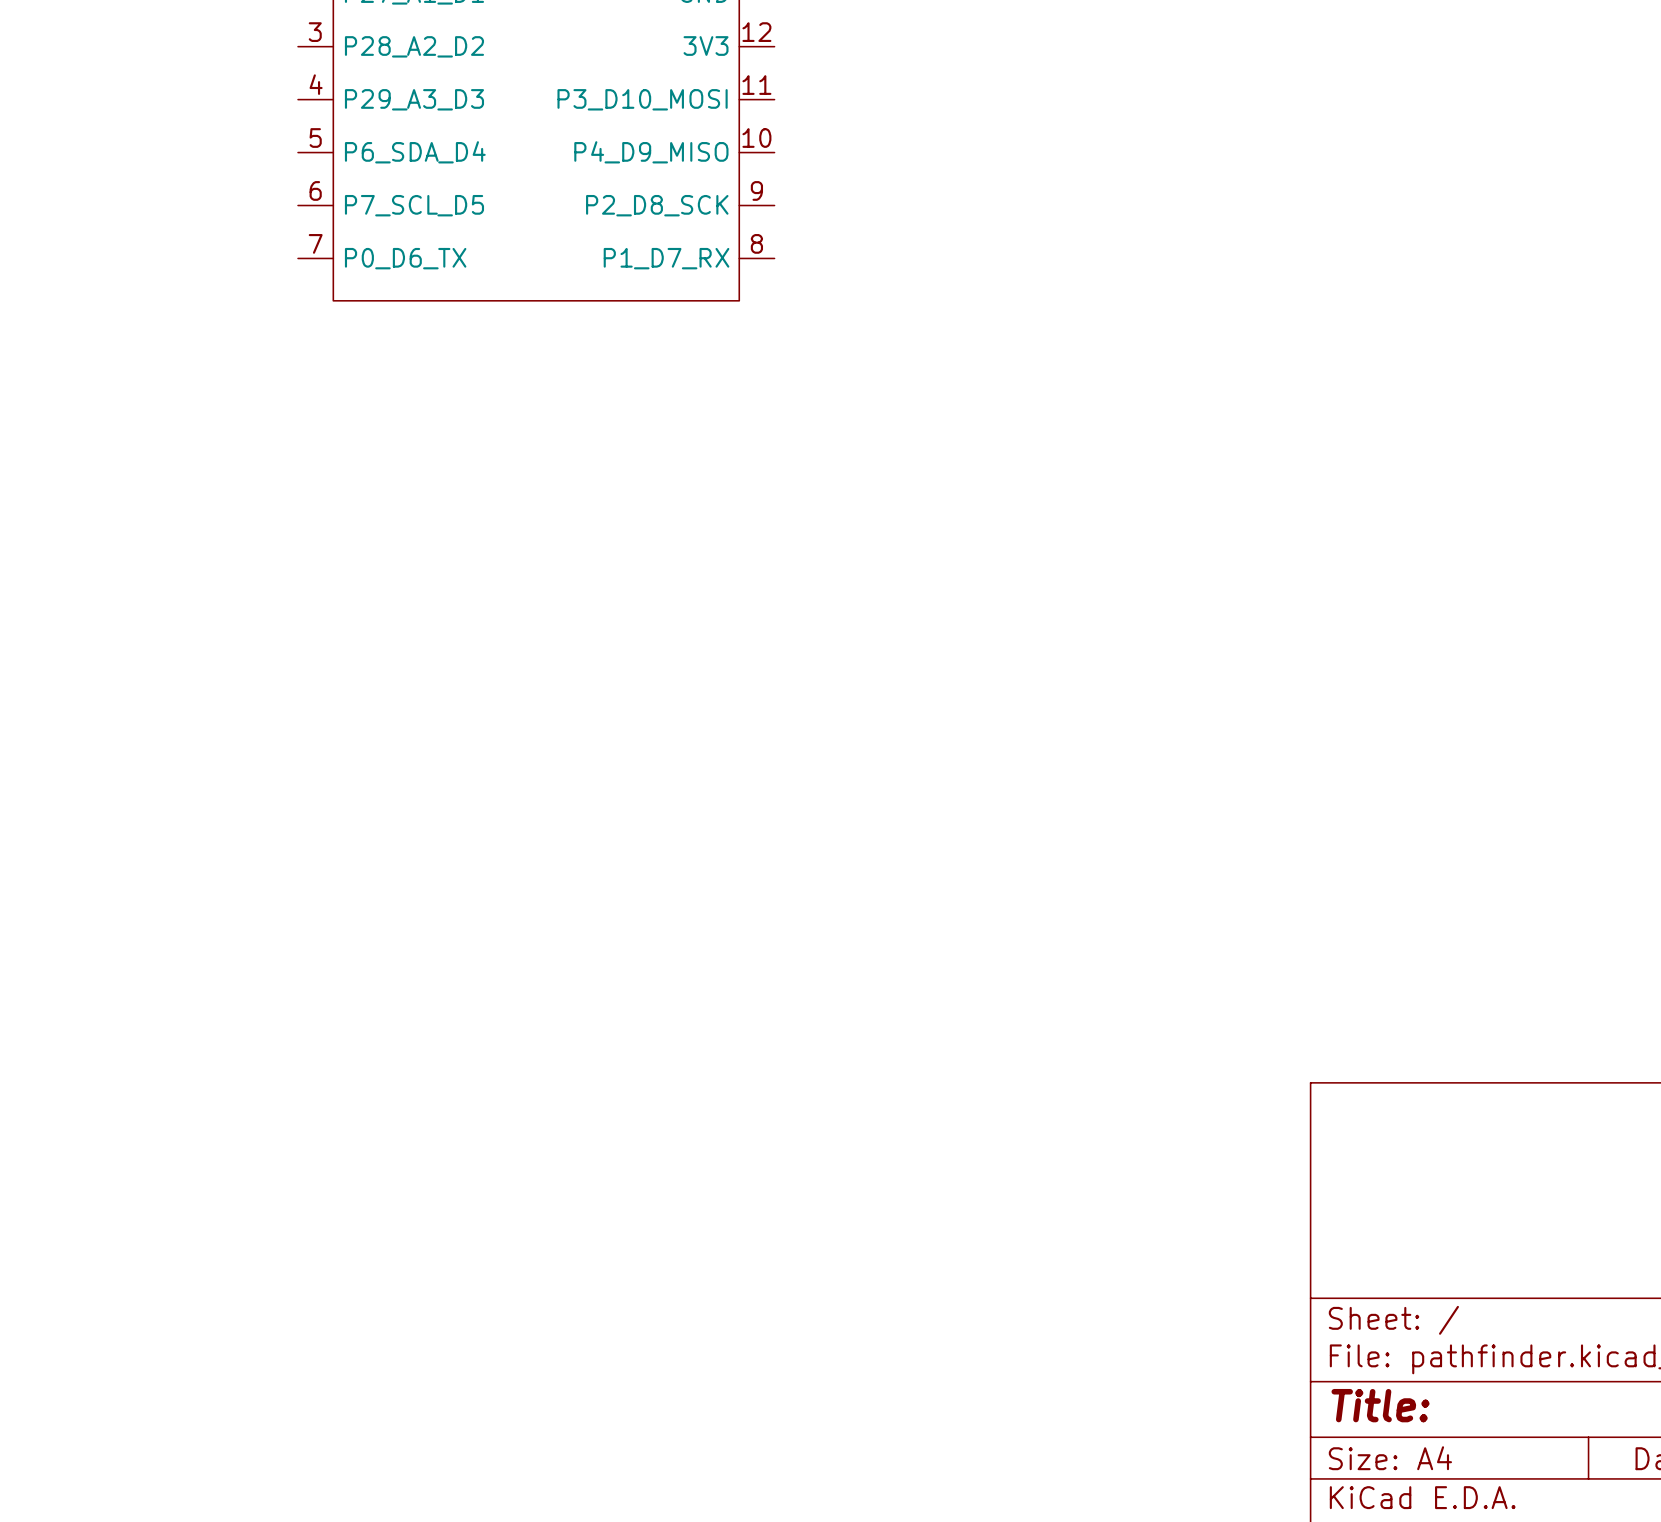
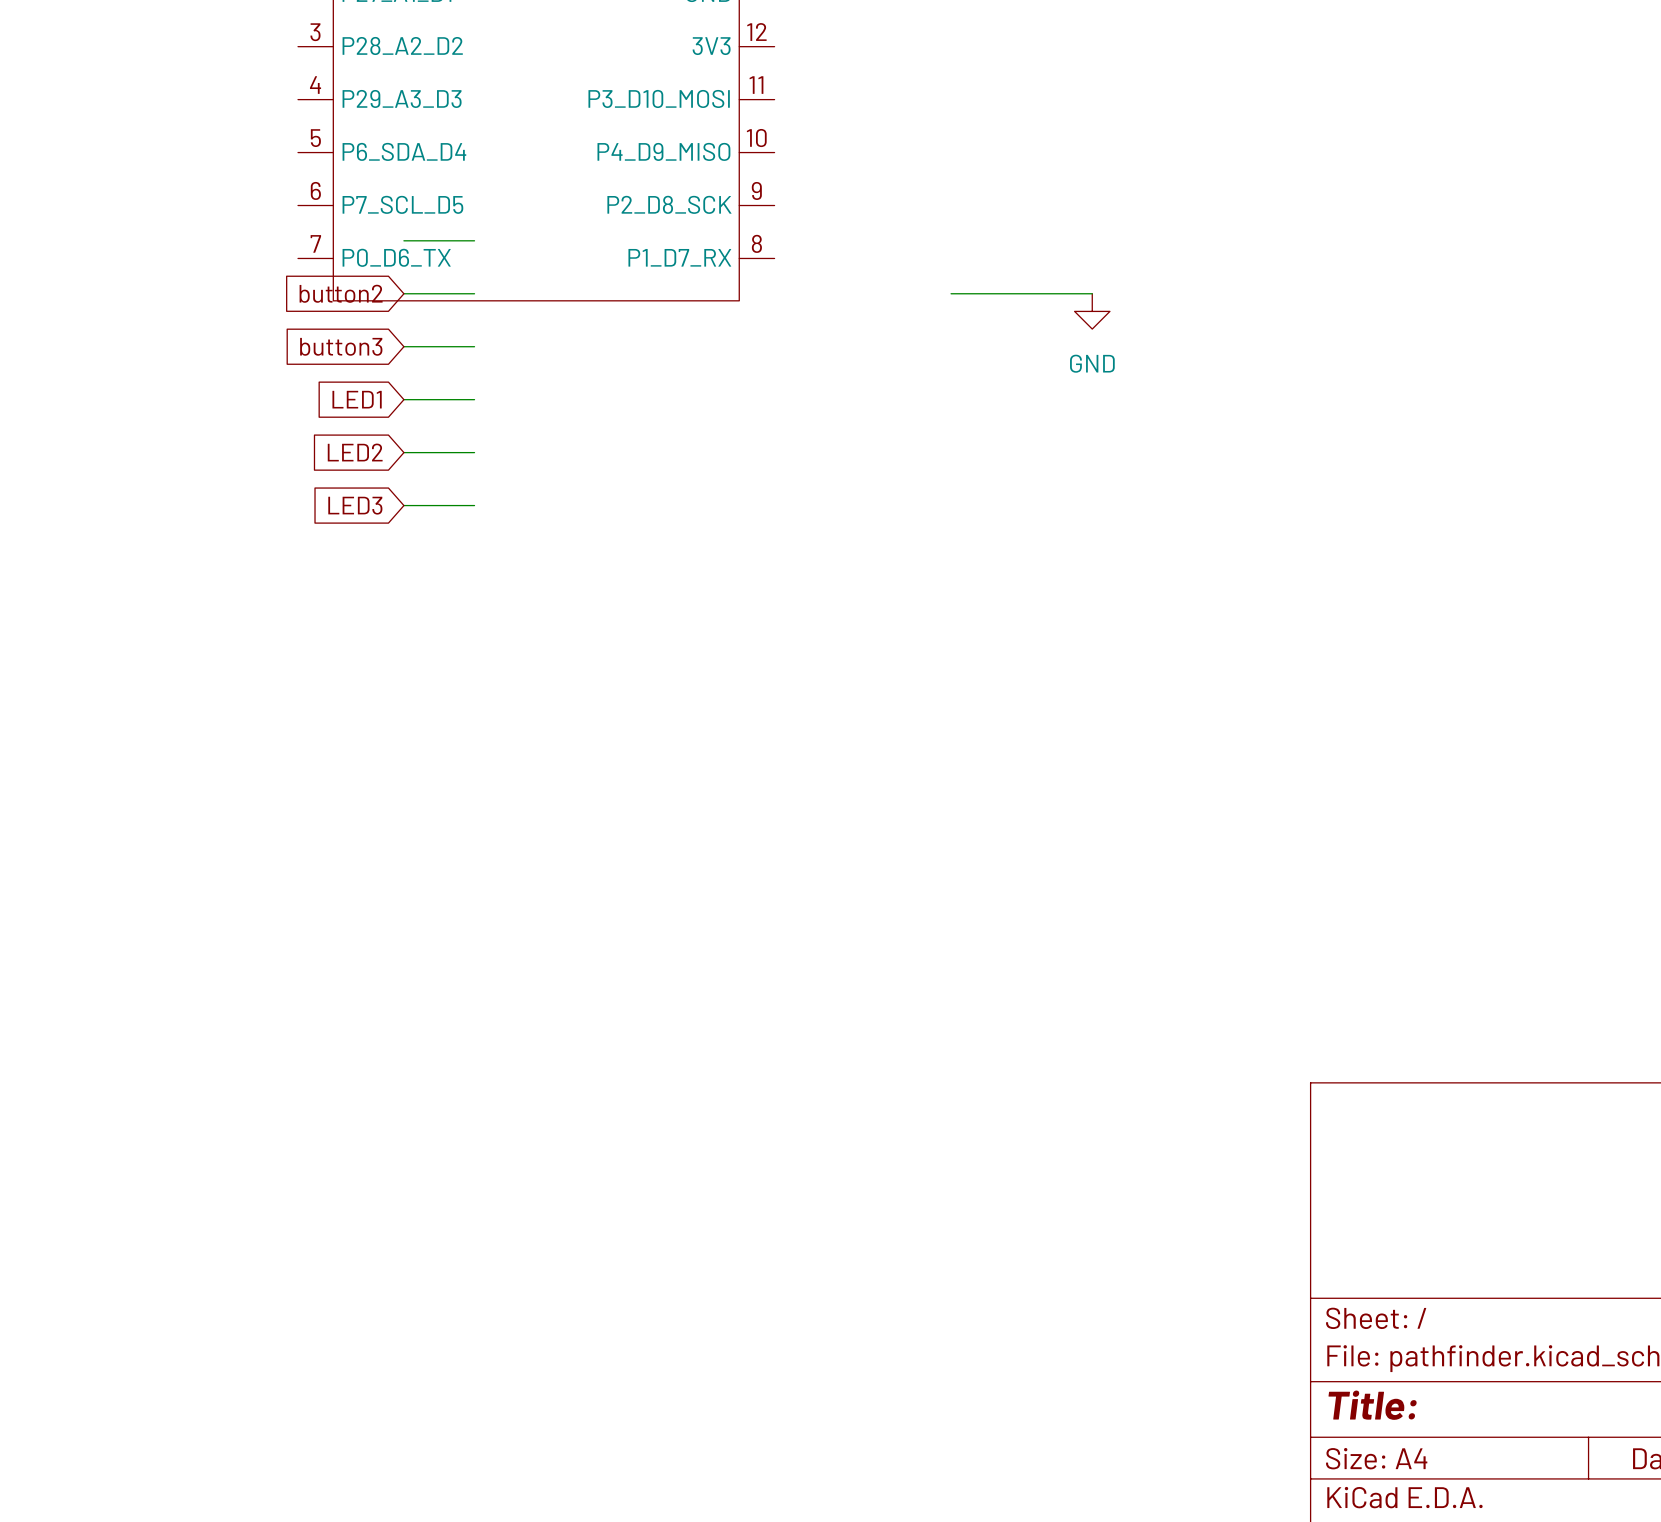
wire: none -> (403, 240) (474, 240)
global label: none -> button2 (341, 293)
wire: none -> (403, 293) (474, 293)
wire: none -> (951, 293) (1092, 293)
power symbol: none -> GND (1092, 311)
global label: none -> button3 (341, 346)
wire: none -> (403, 346) (474, 346)
global label: none -> LED1 (357, 399)
wire: none -> (403, 399) (474, 399)
global label: none -> LED2 (355, 452)
wire: none -> (403, 452) (474, 452)
global label: none -> LED3 (355, 505)
wire: none -> (403, 505) (474, 505)

